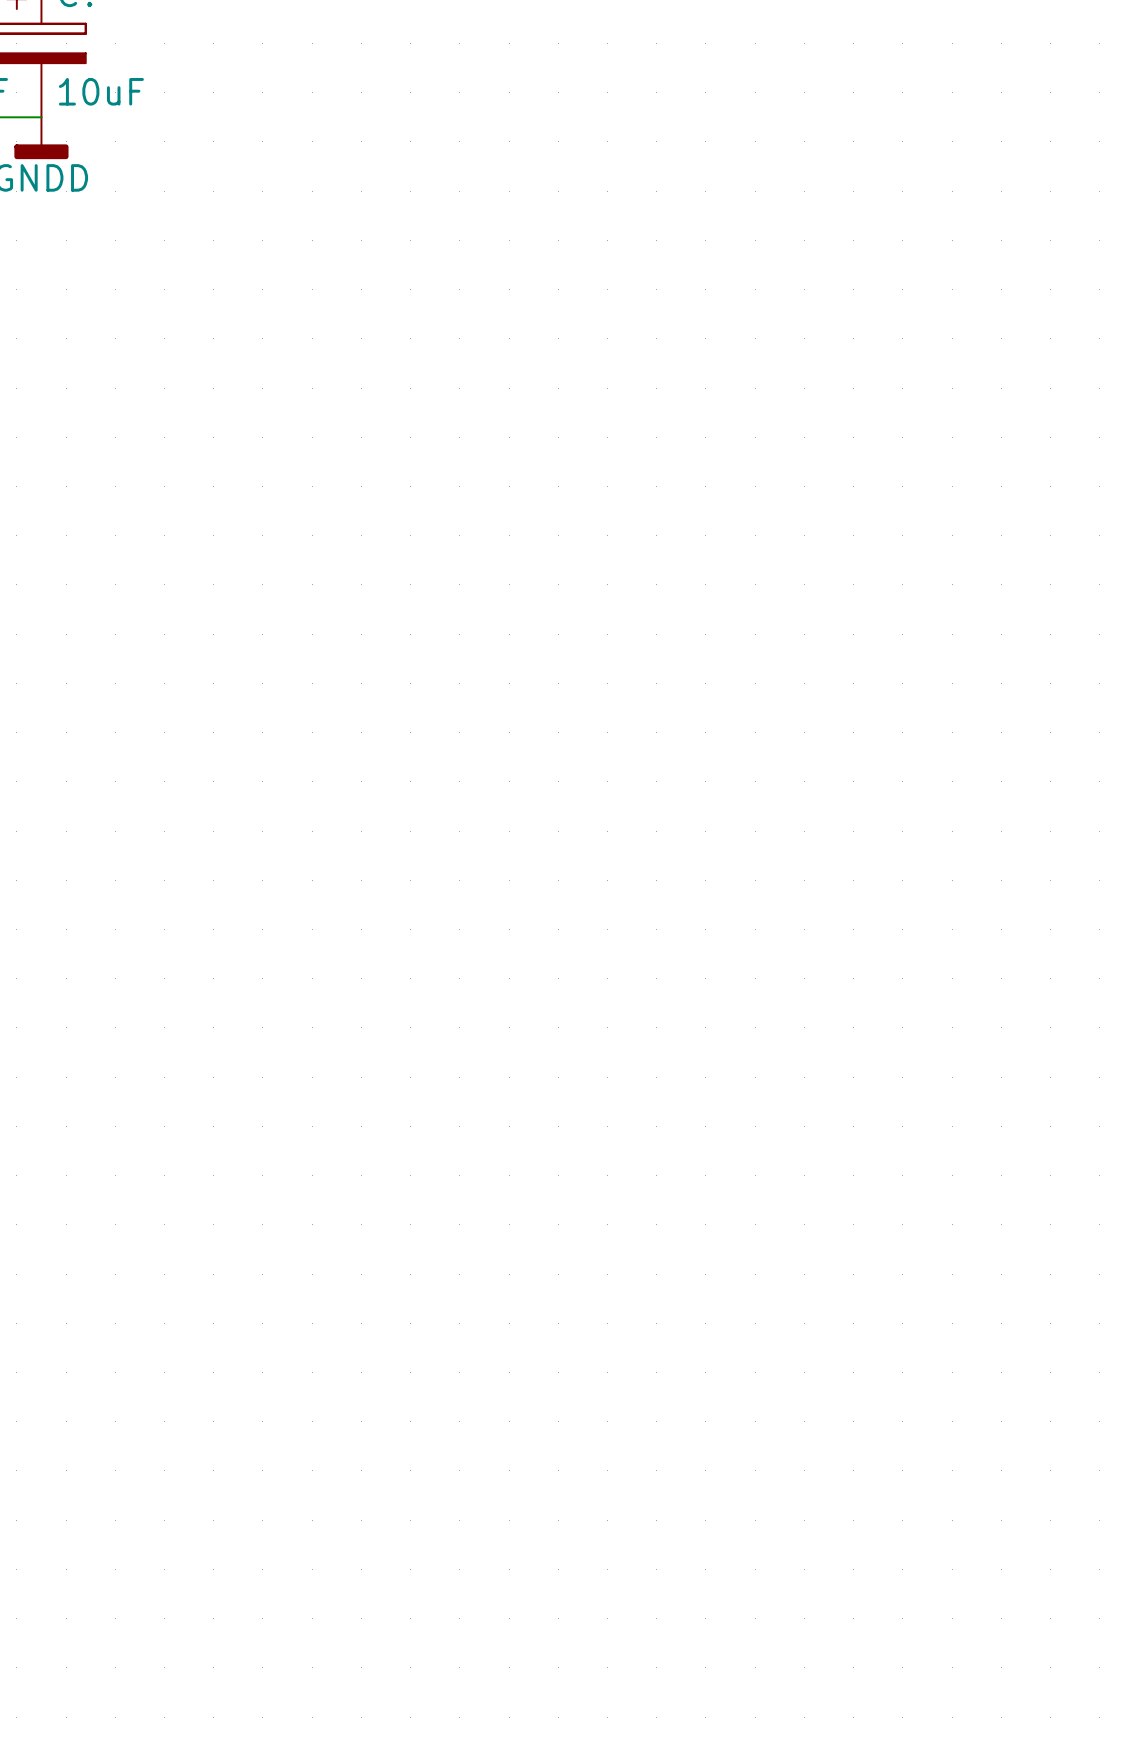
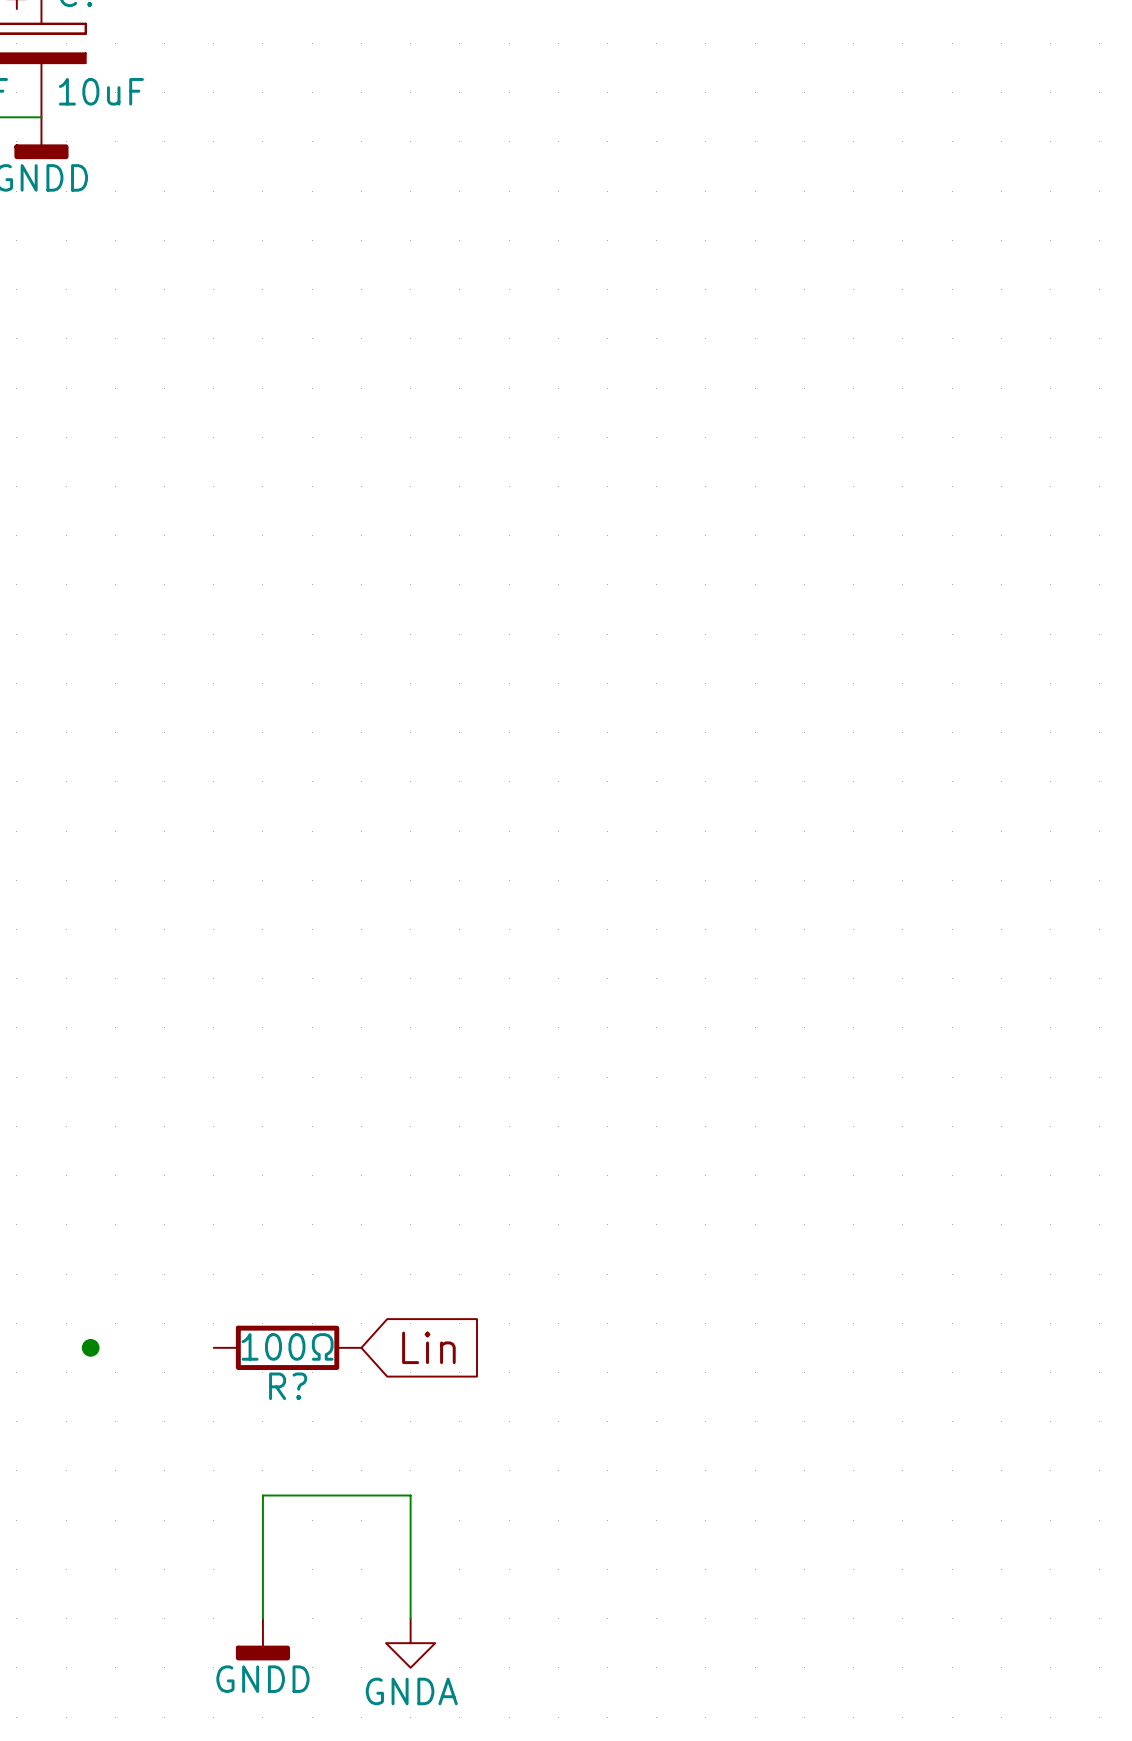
junction: none -> (90, 1347)
R?: none -> 100Ω (287, 1347)
global label: none -> Lin (428, 1347)
wire: none -> (262, 1618) (262, 1495) (410, 1495) (410, 1618)
power symbol: none -> GNDD (262, 1639)
power symbol: none -> GNDA (410, 1643)

